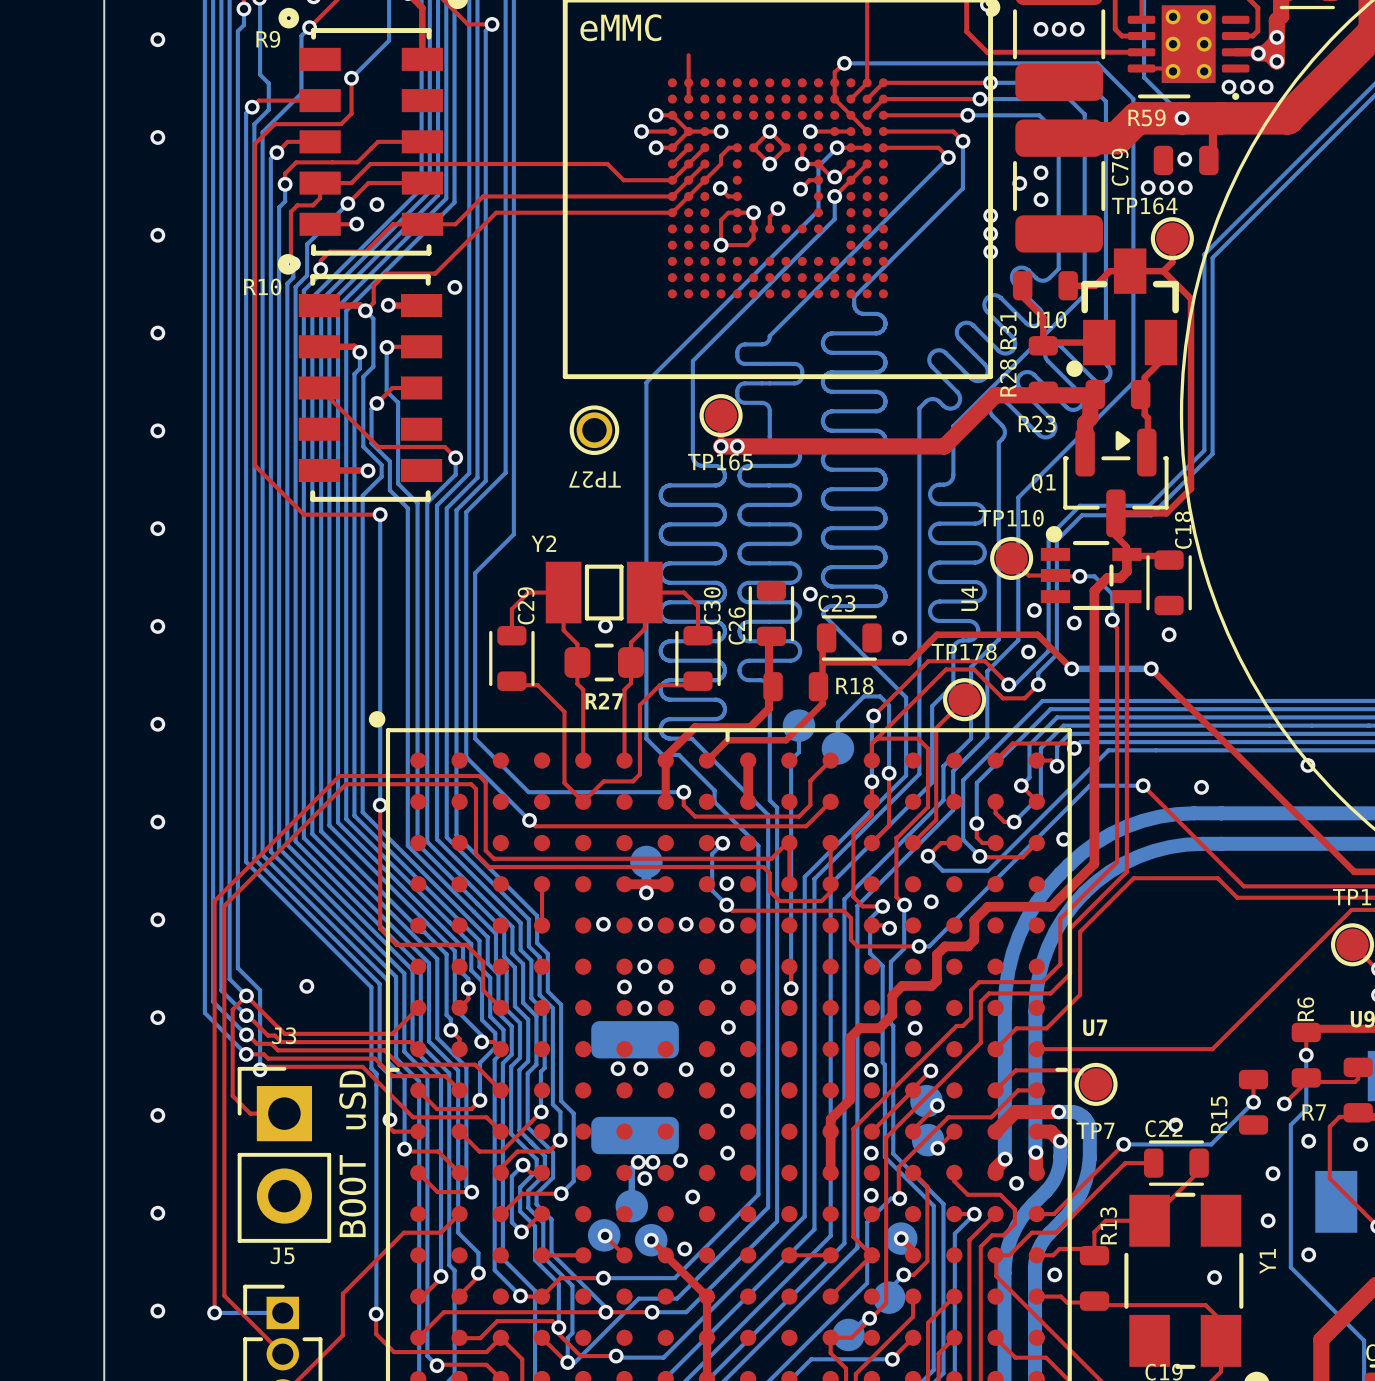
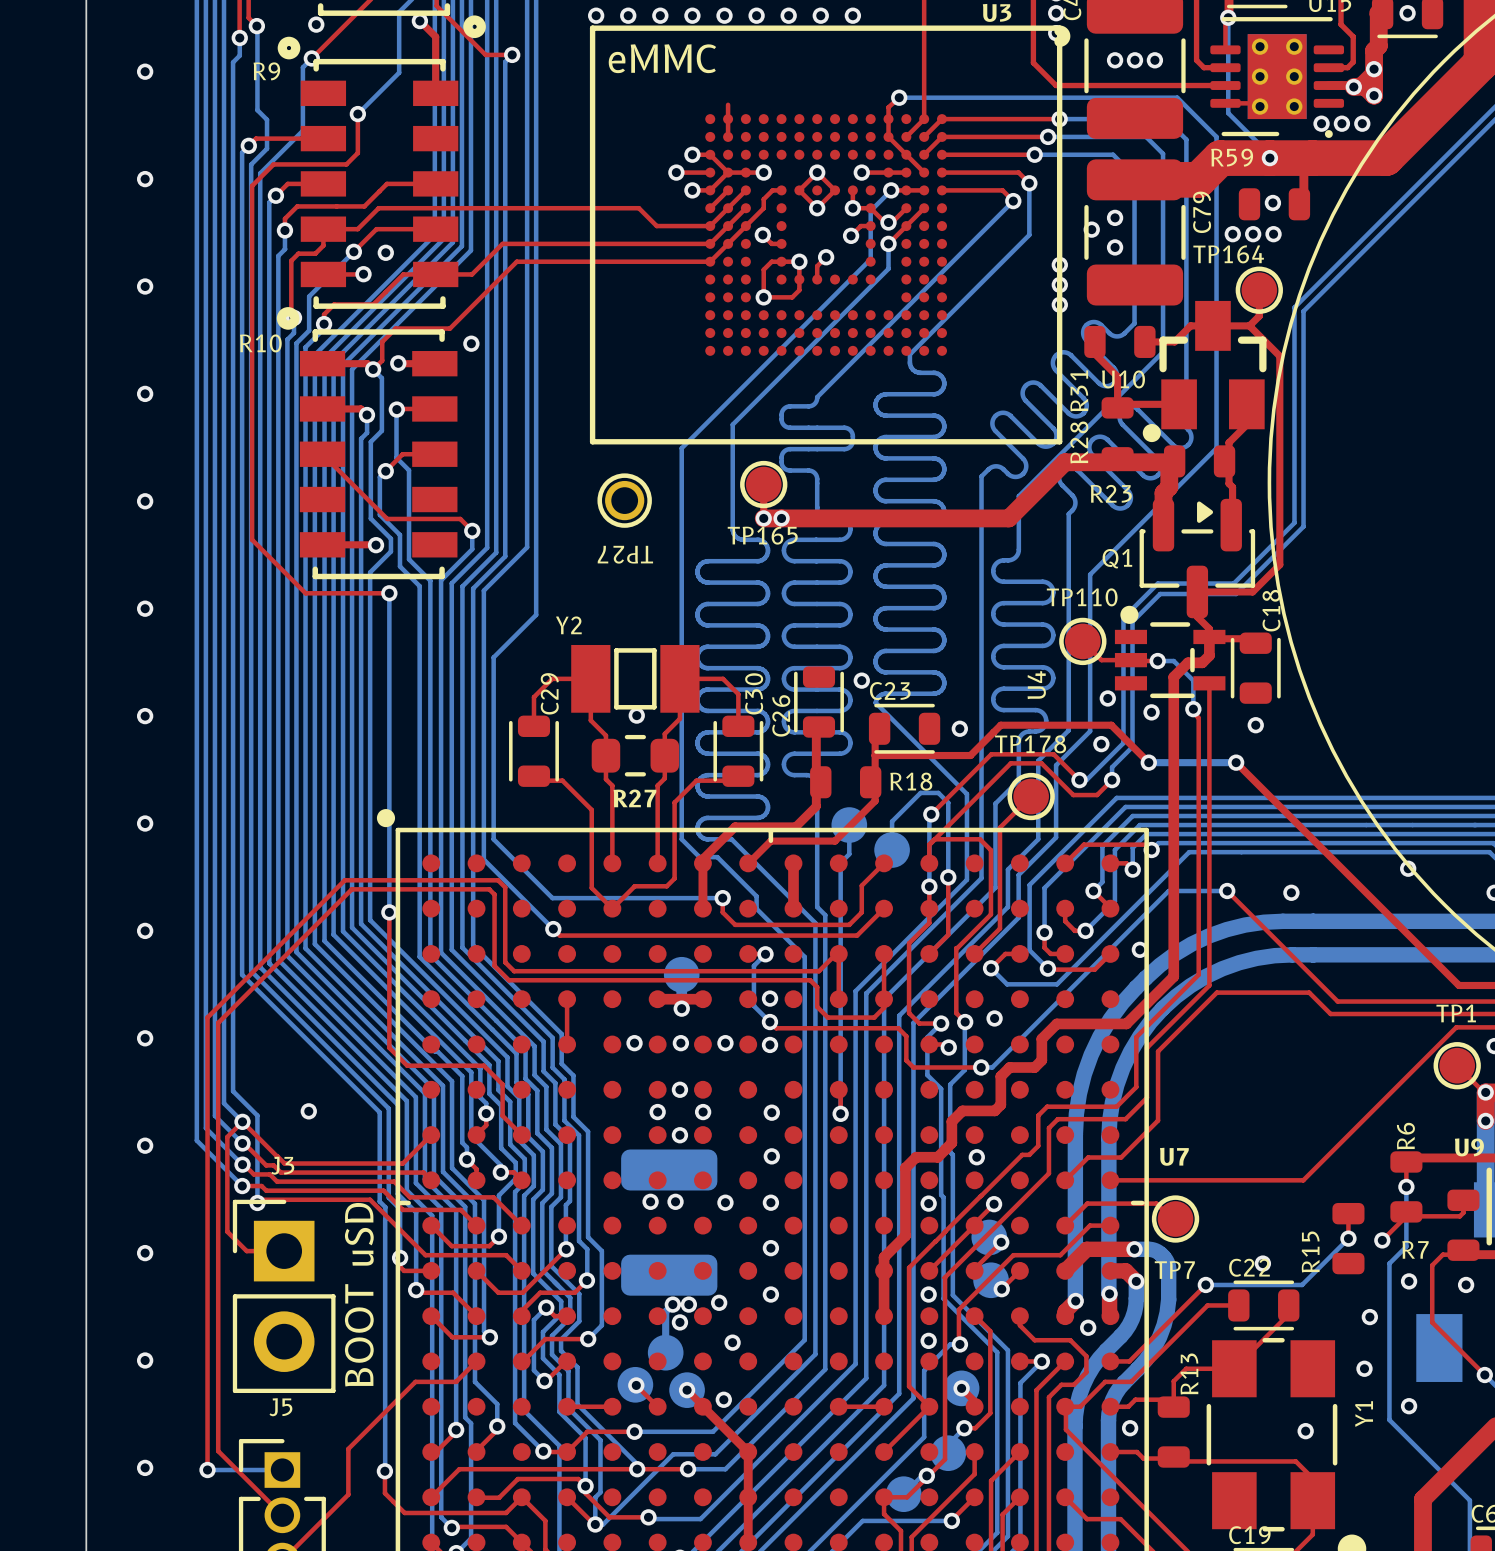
top track: (688, 55) (688, 69) -> none

